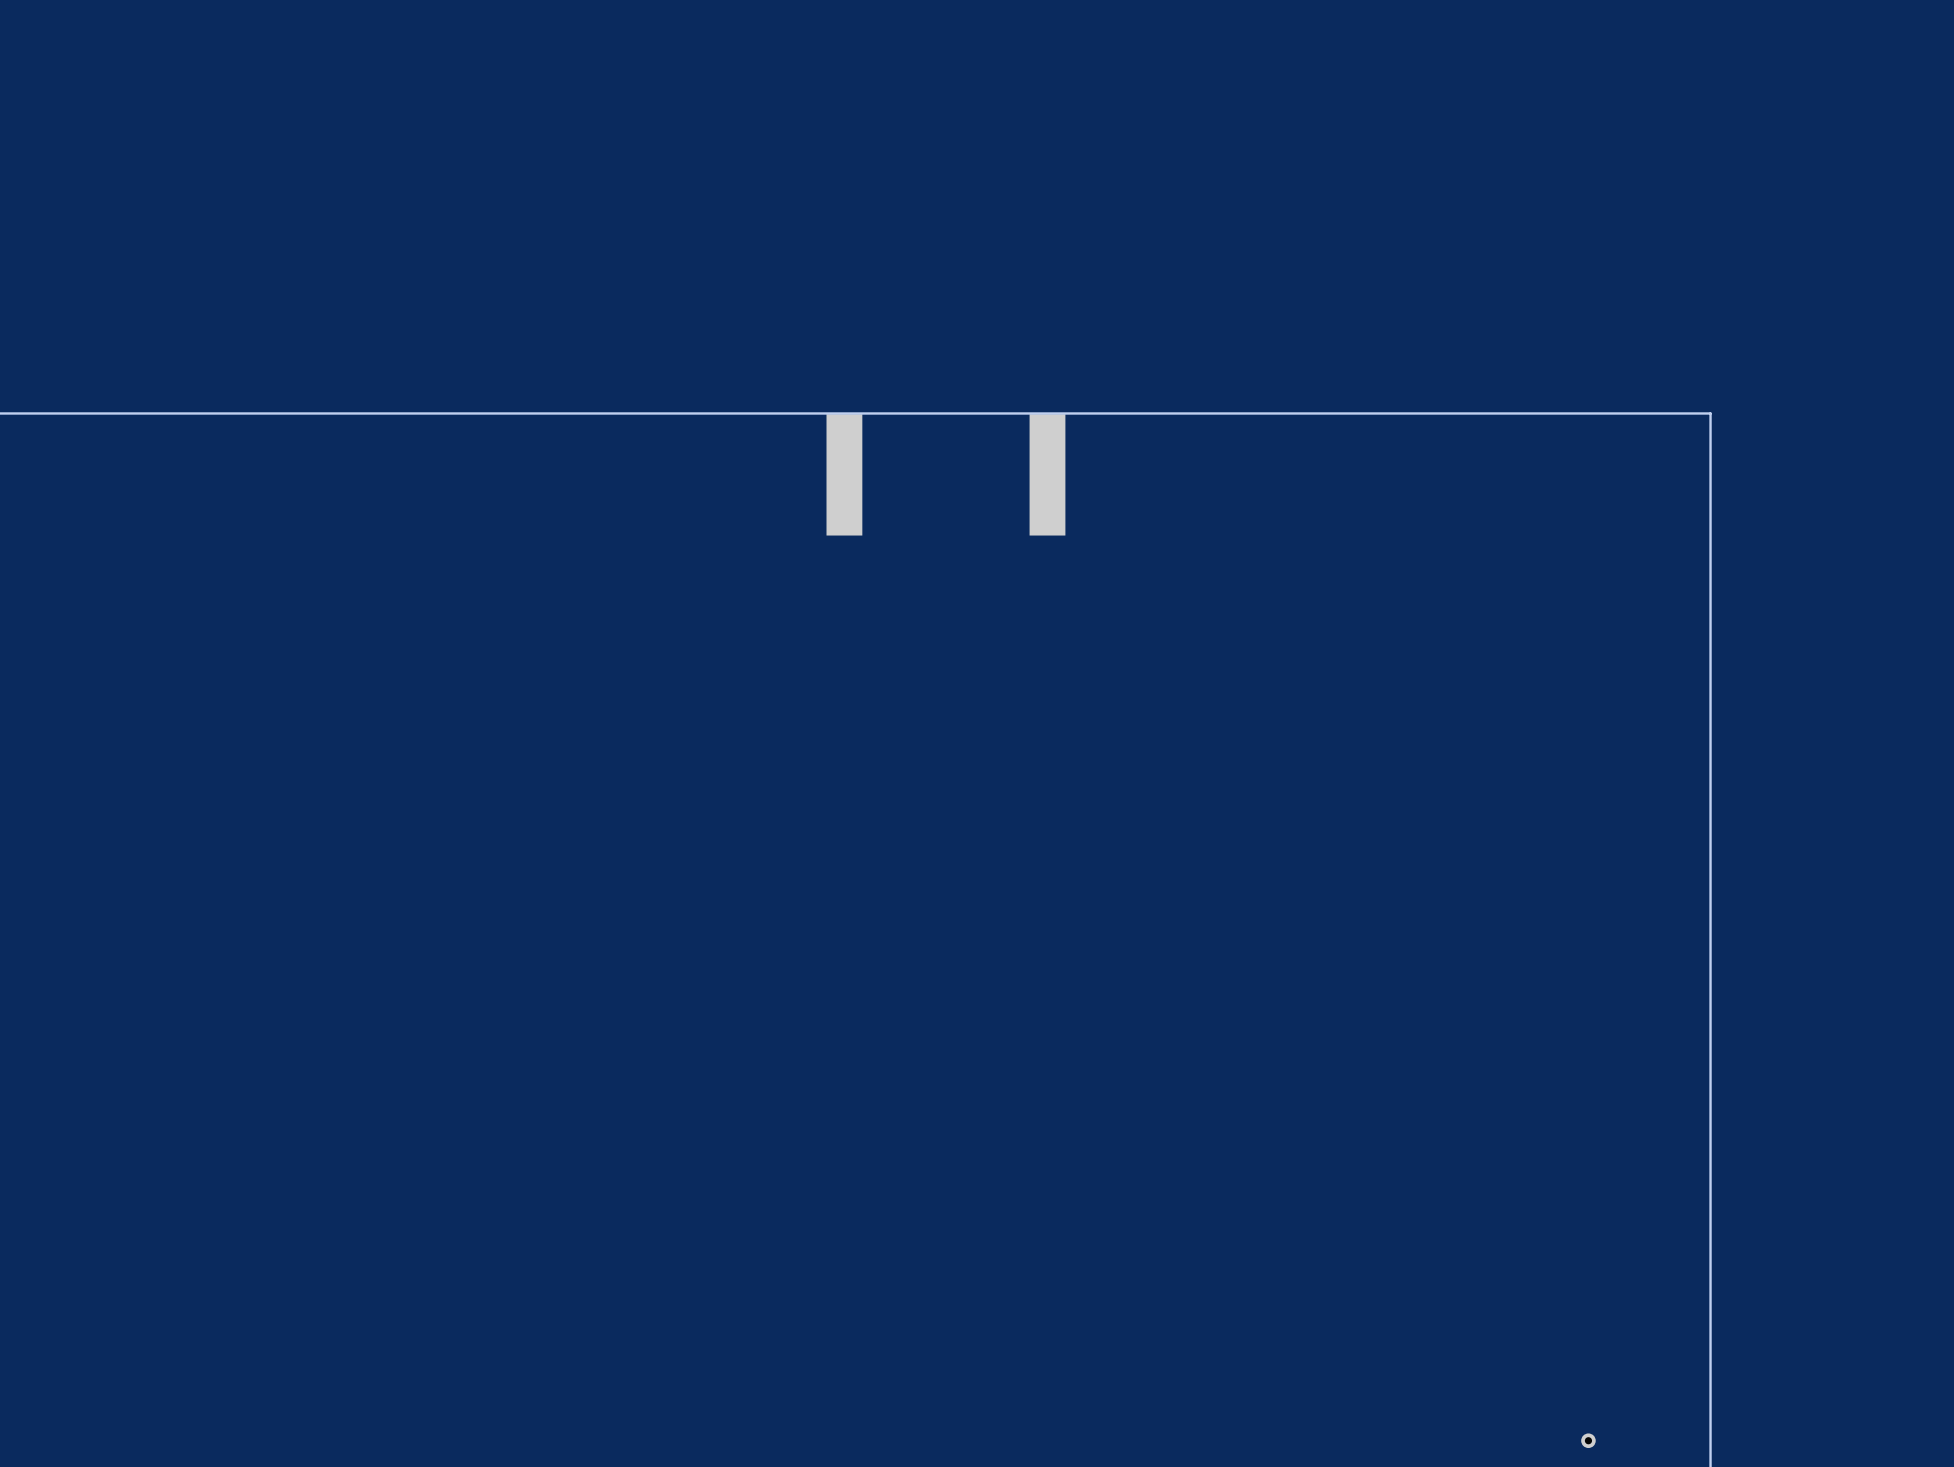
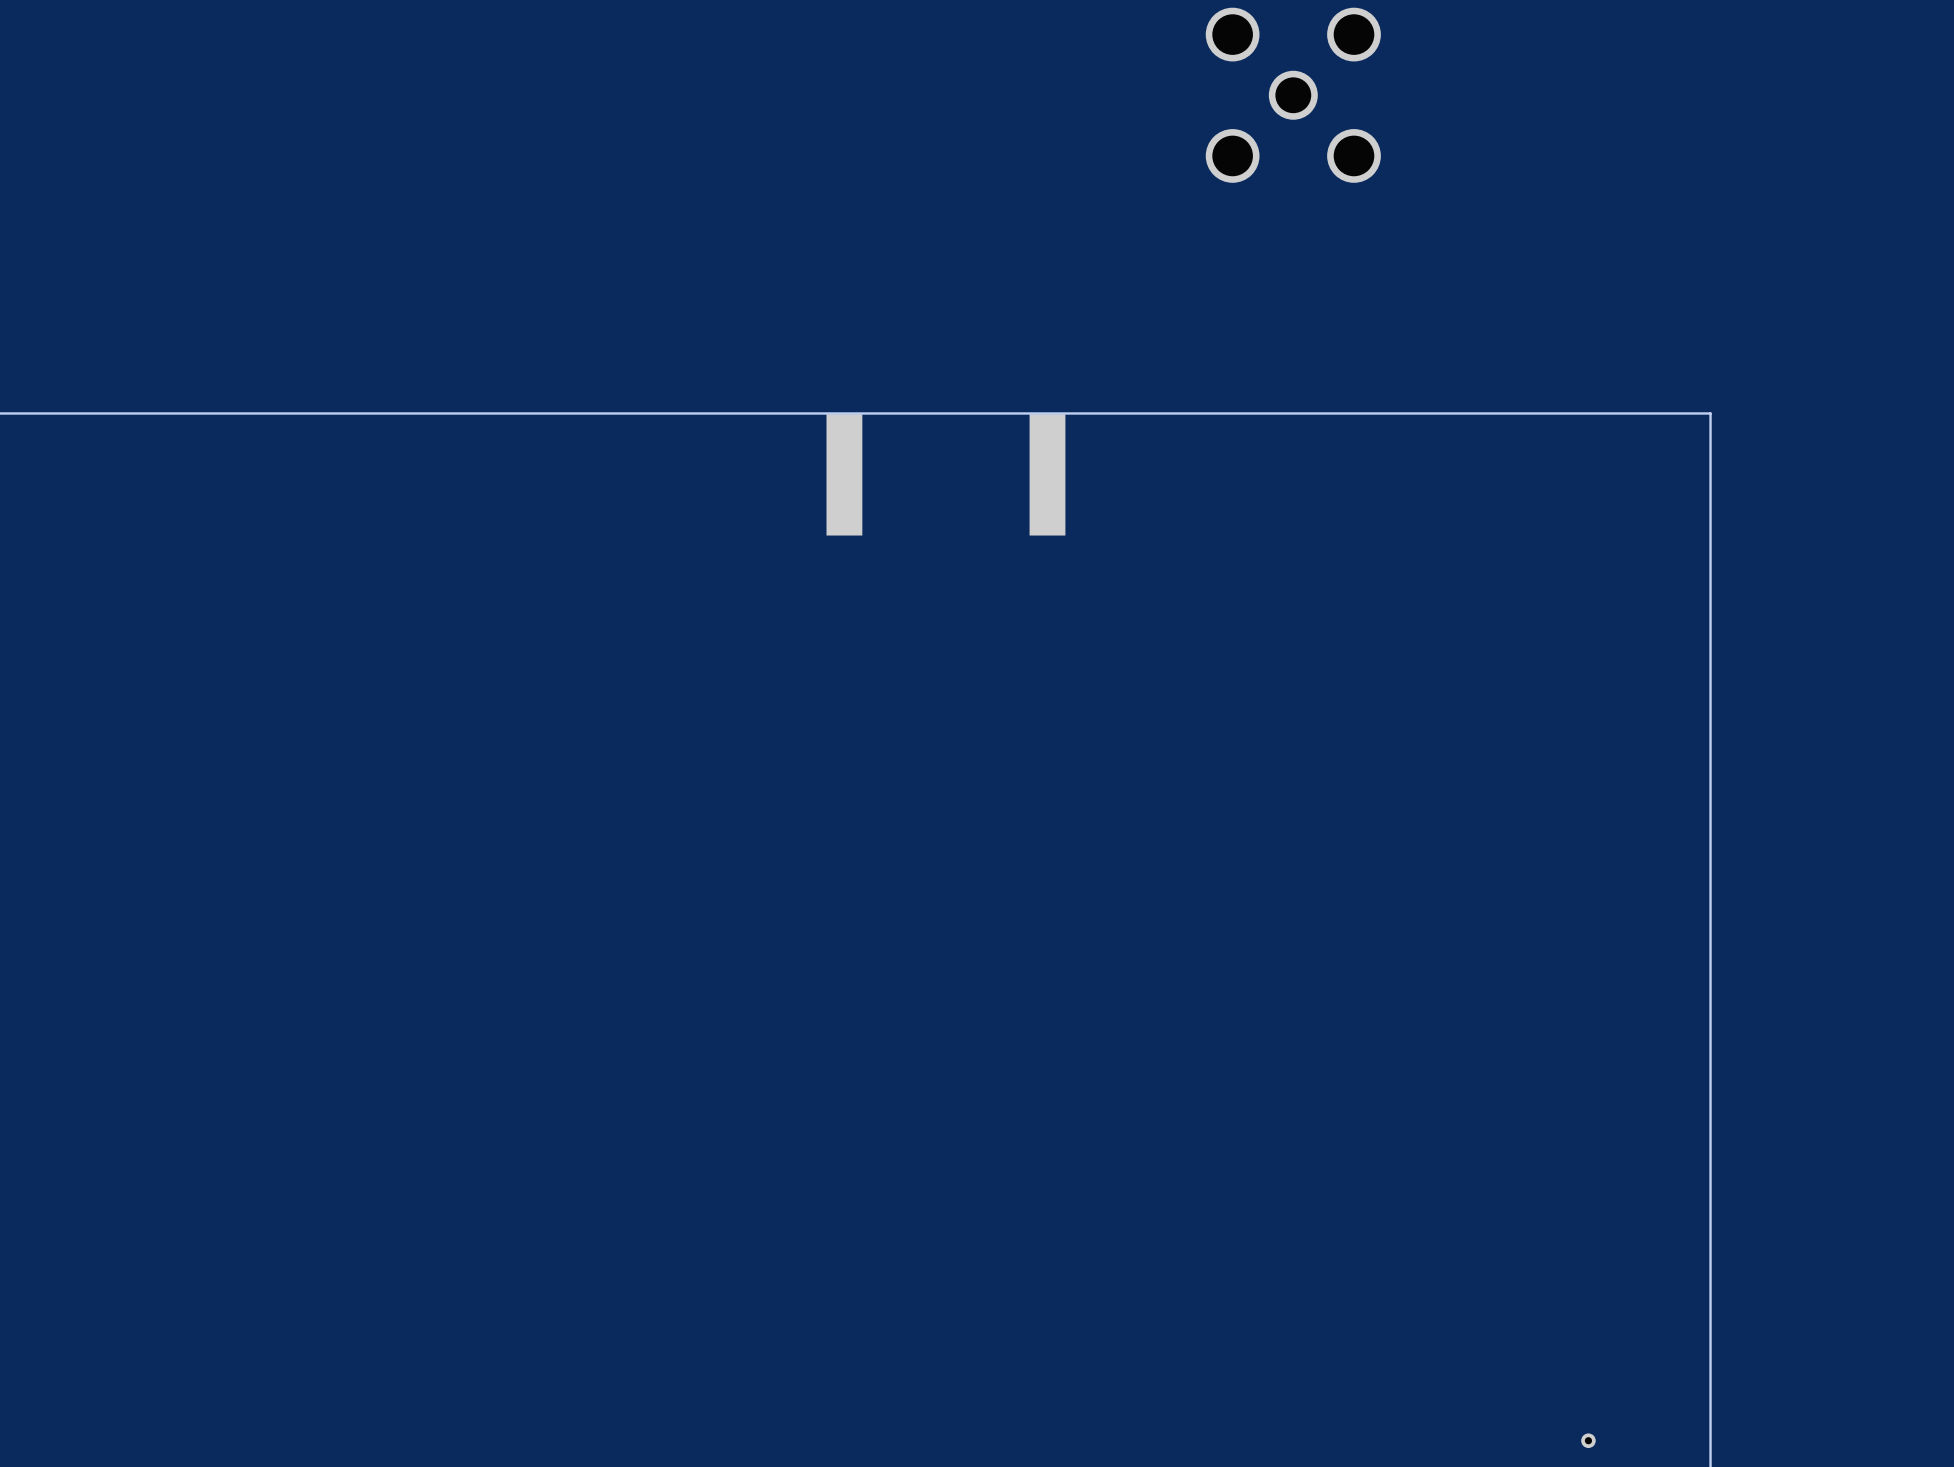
part: none -> (1293, 95)

